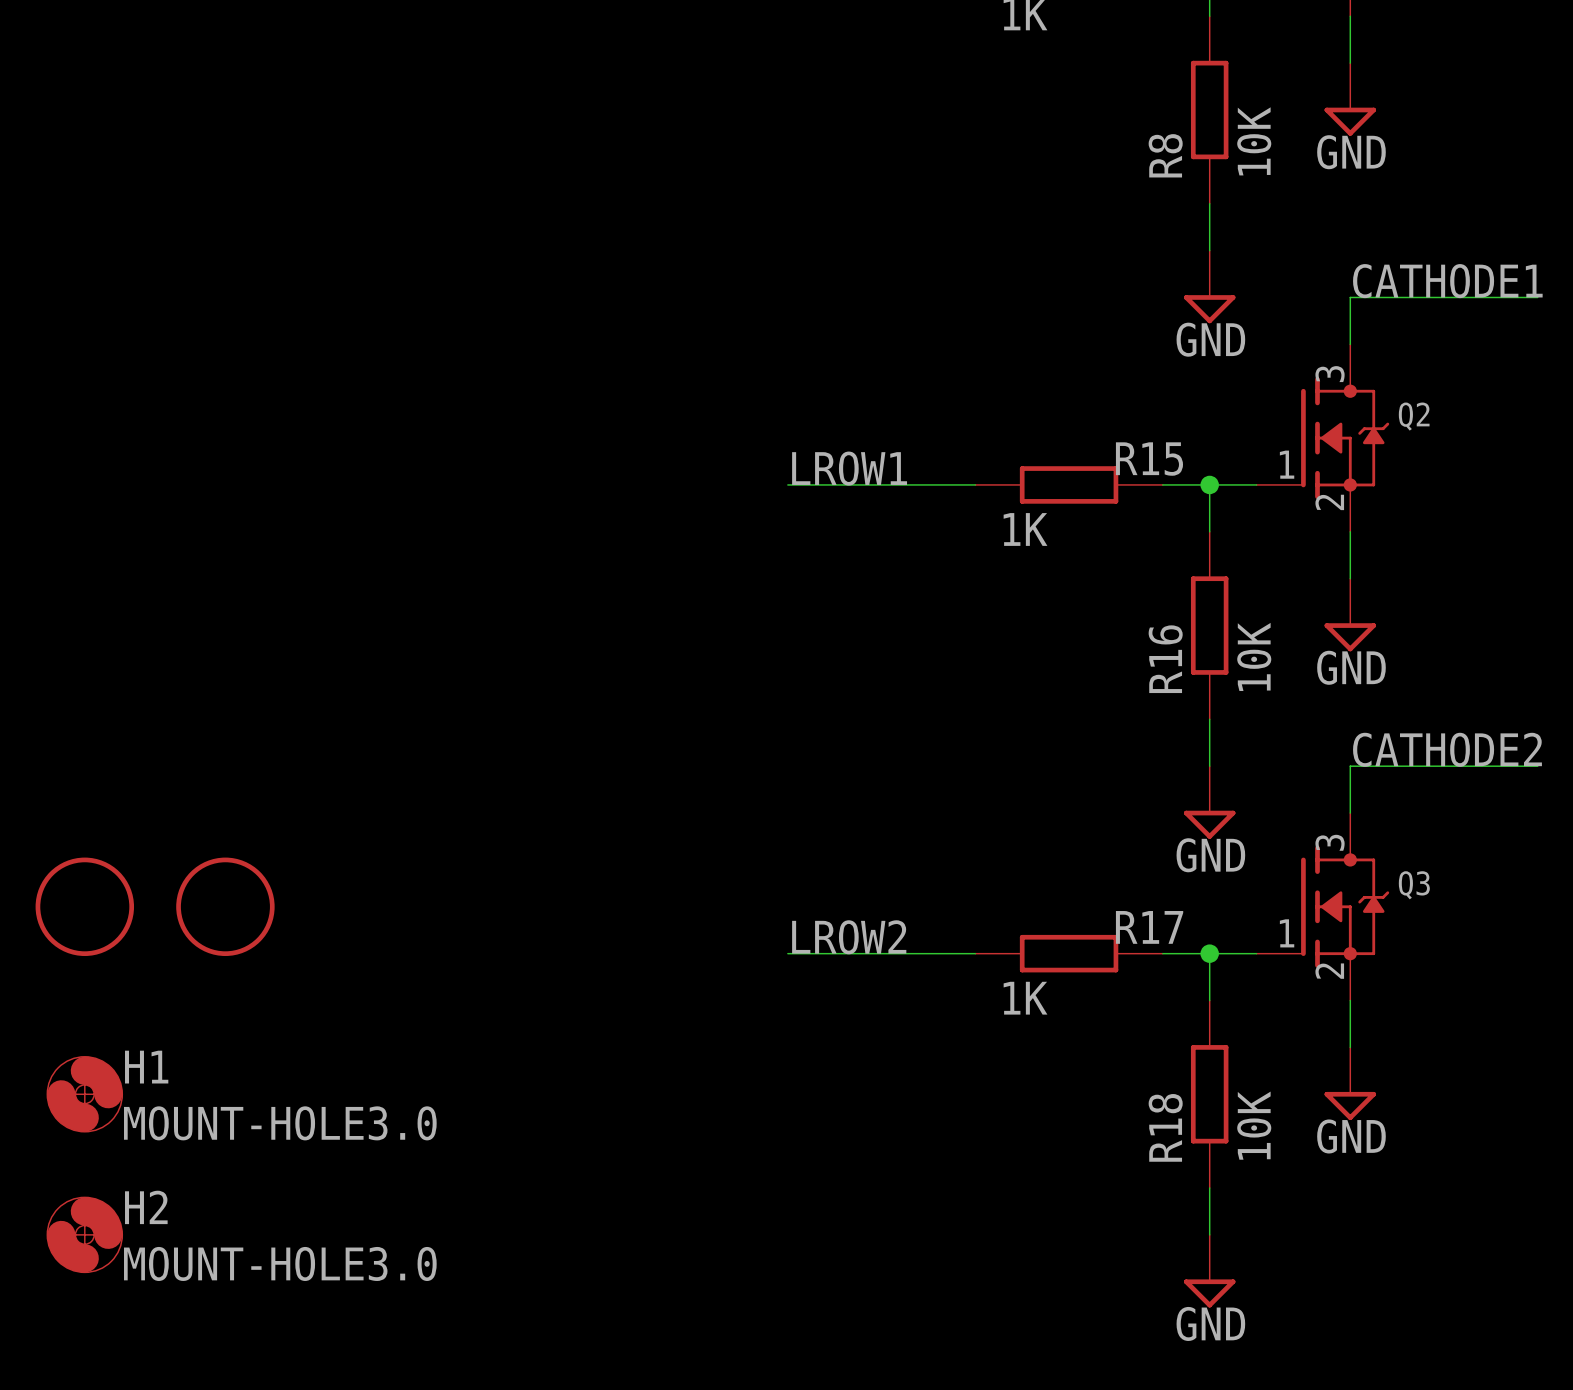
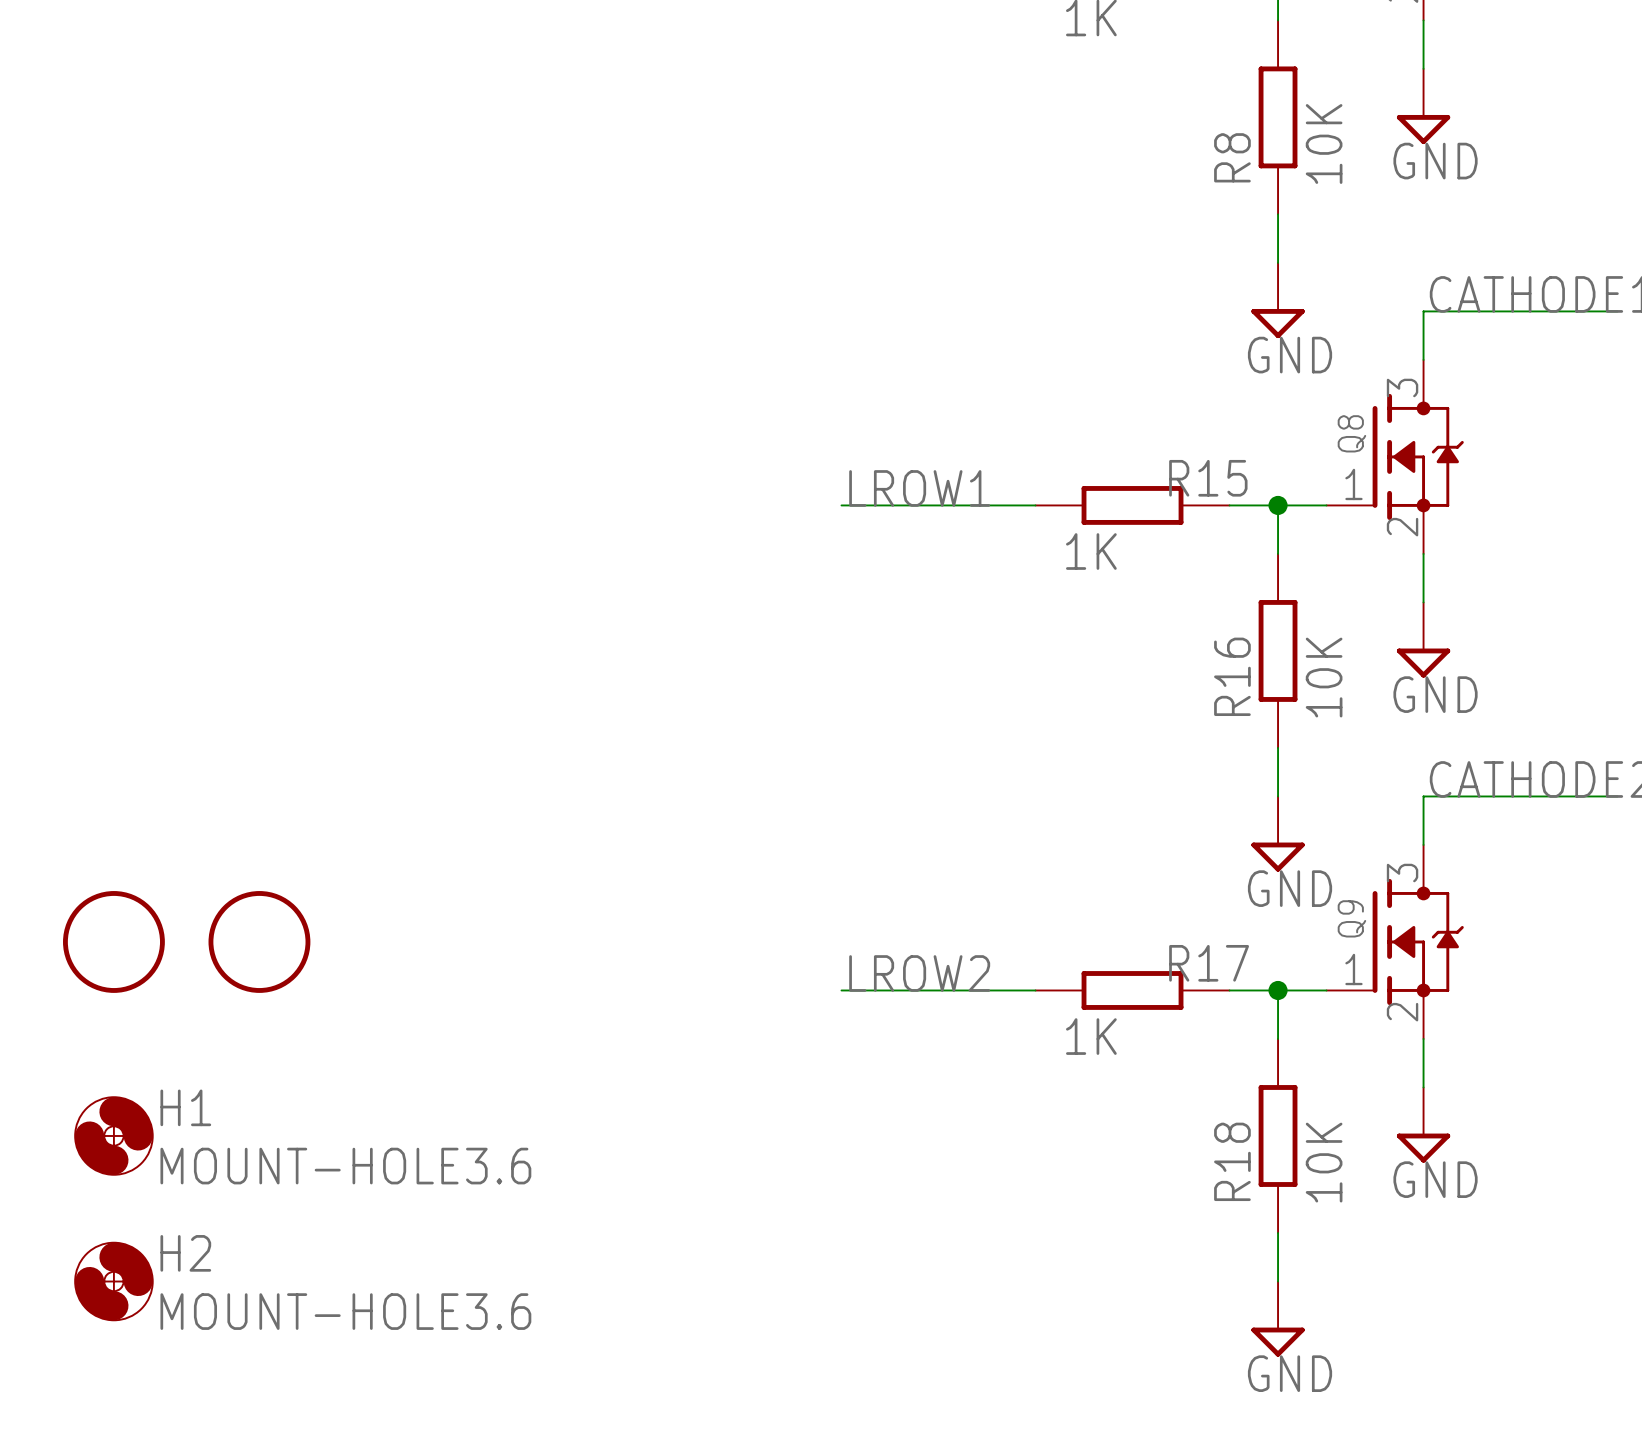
Q2 name: Q2 (1414, 416) -> Q8 (1351, 433)
Q3 name: Q3 (1414, 885) -> Q9 (1351, 918)
H1 value: MOUNT-HOLE3.0 (280, 1123) -> MOUNT-HOLE3.6 (345, 1166)
H2 value: MOUNT-HOLE3.0 (280, 1263) -> MOUNT-HOLE3.6 (345, 1311)

